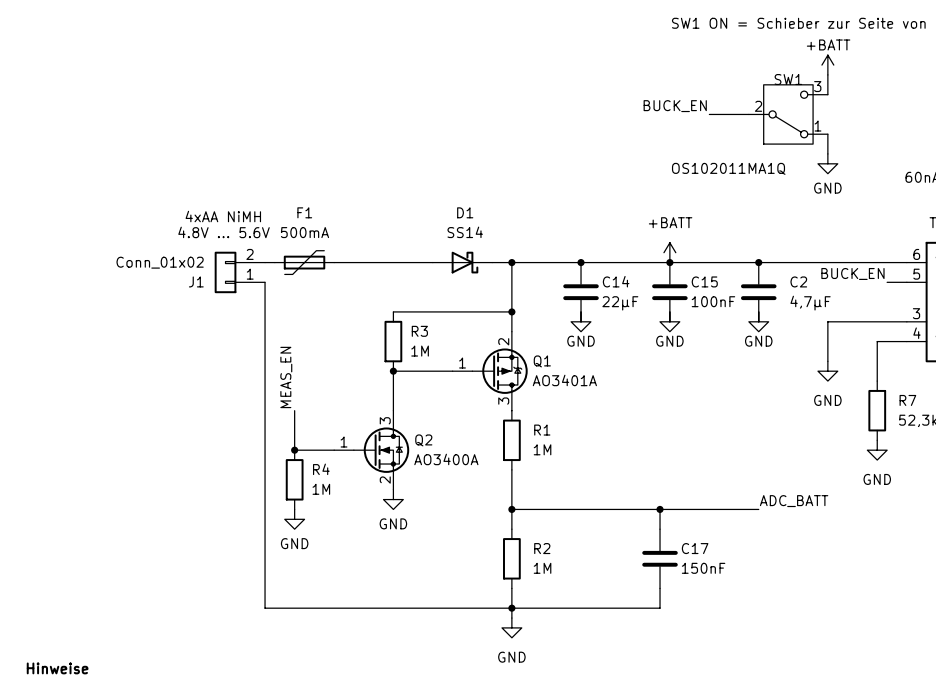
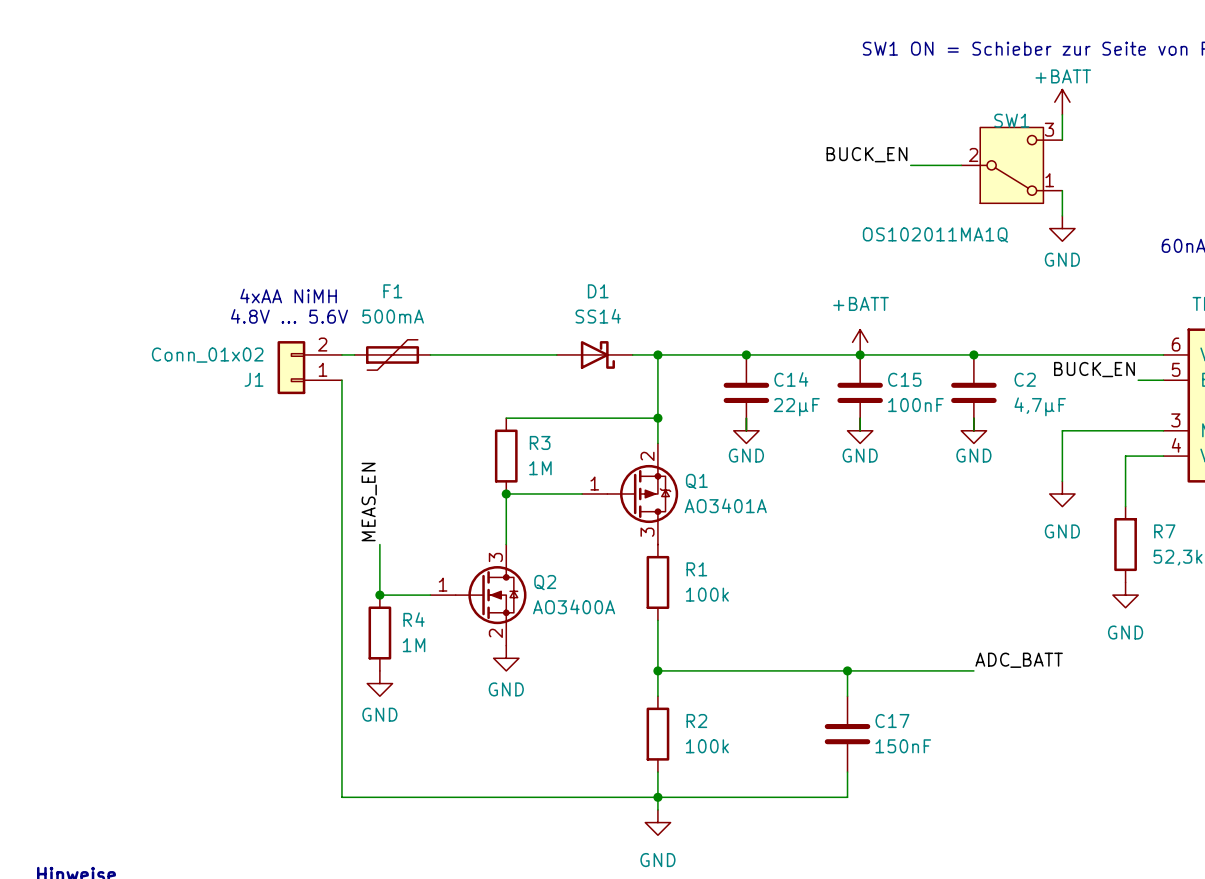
R1 value: 1M (542, 449) -> 100k (707, 594)
R2 value: 1M (542, 568) -> 100k (707, 746)

